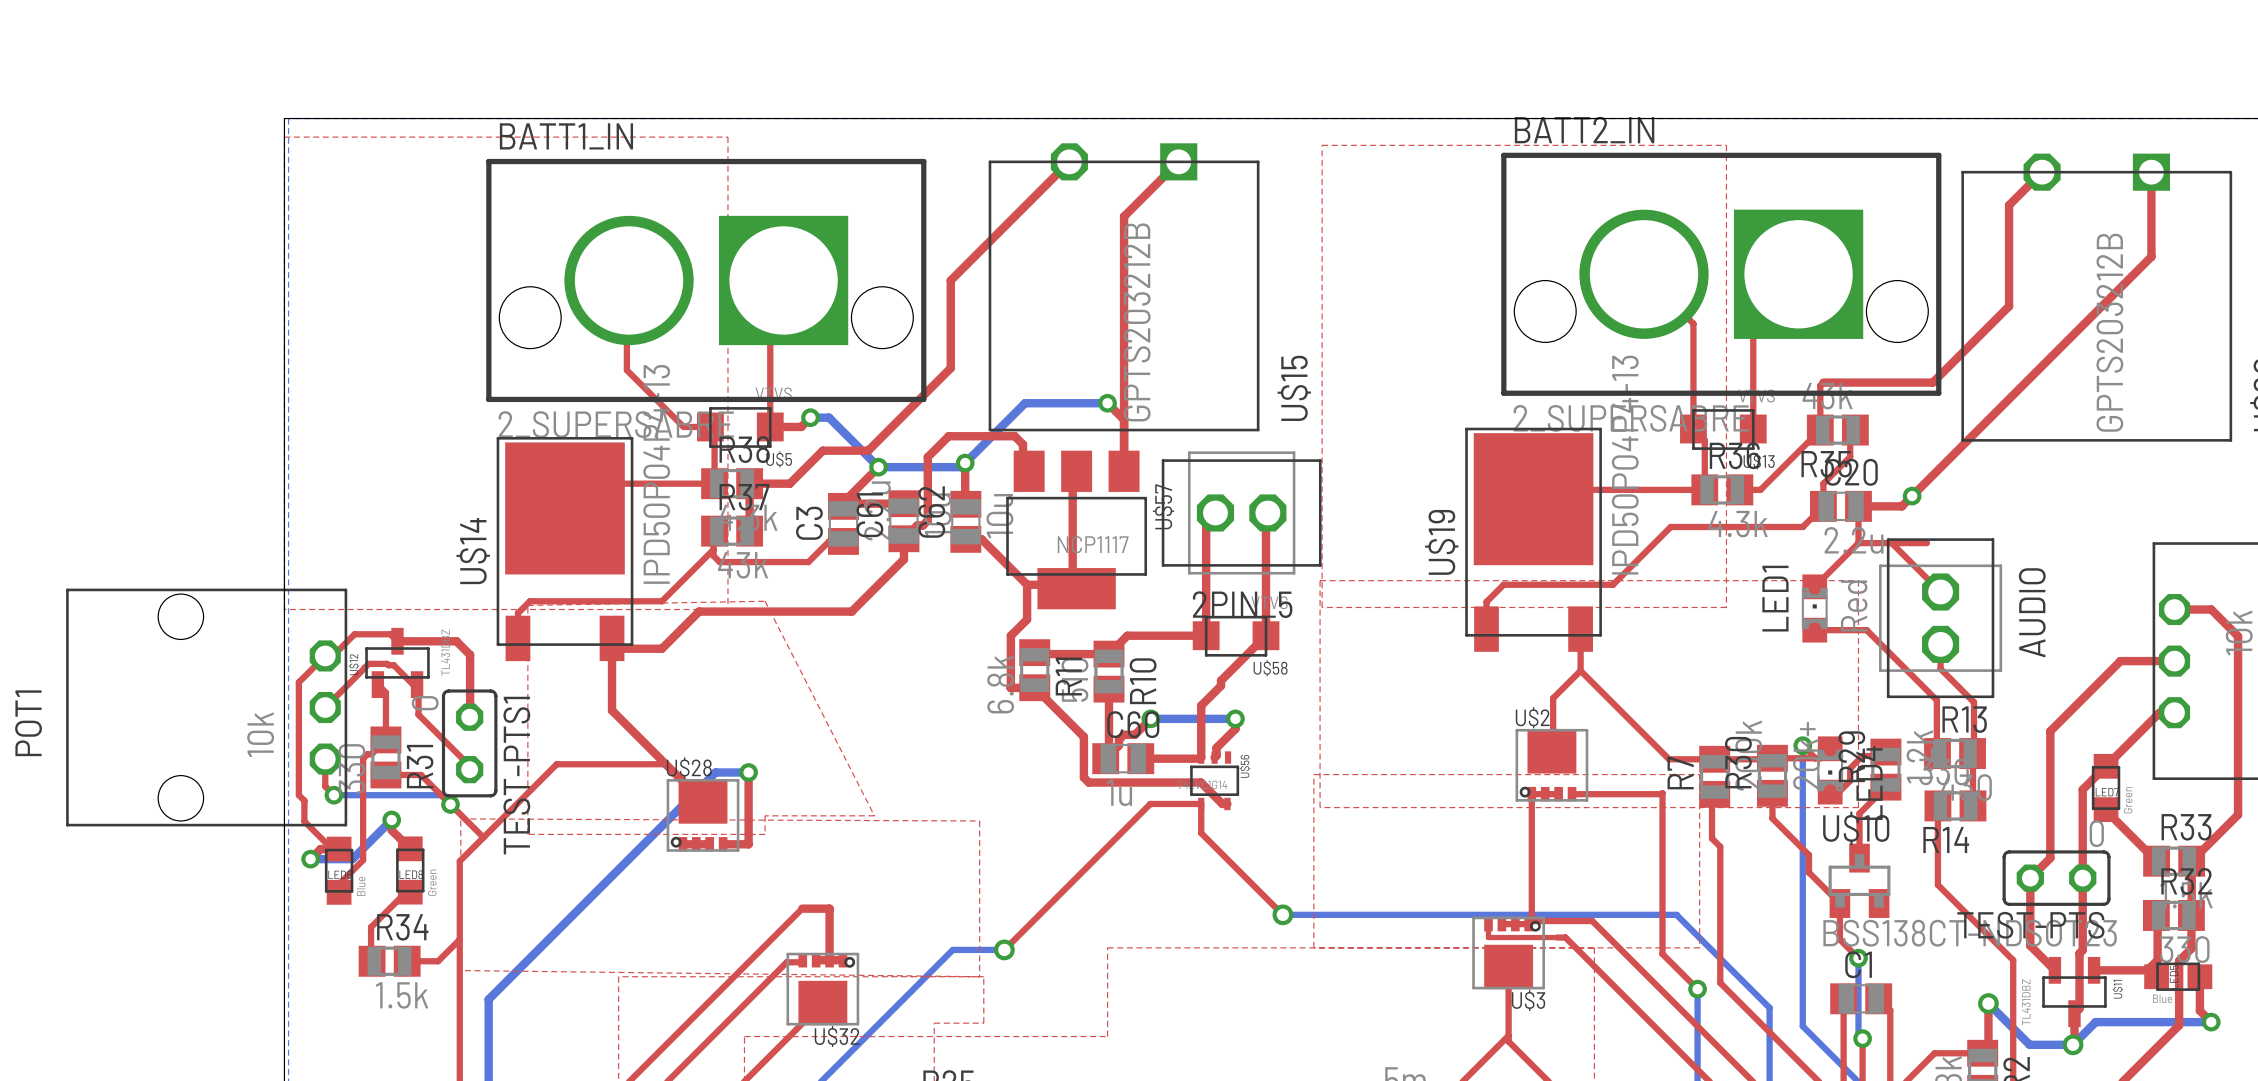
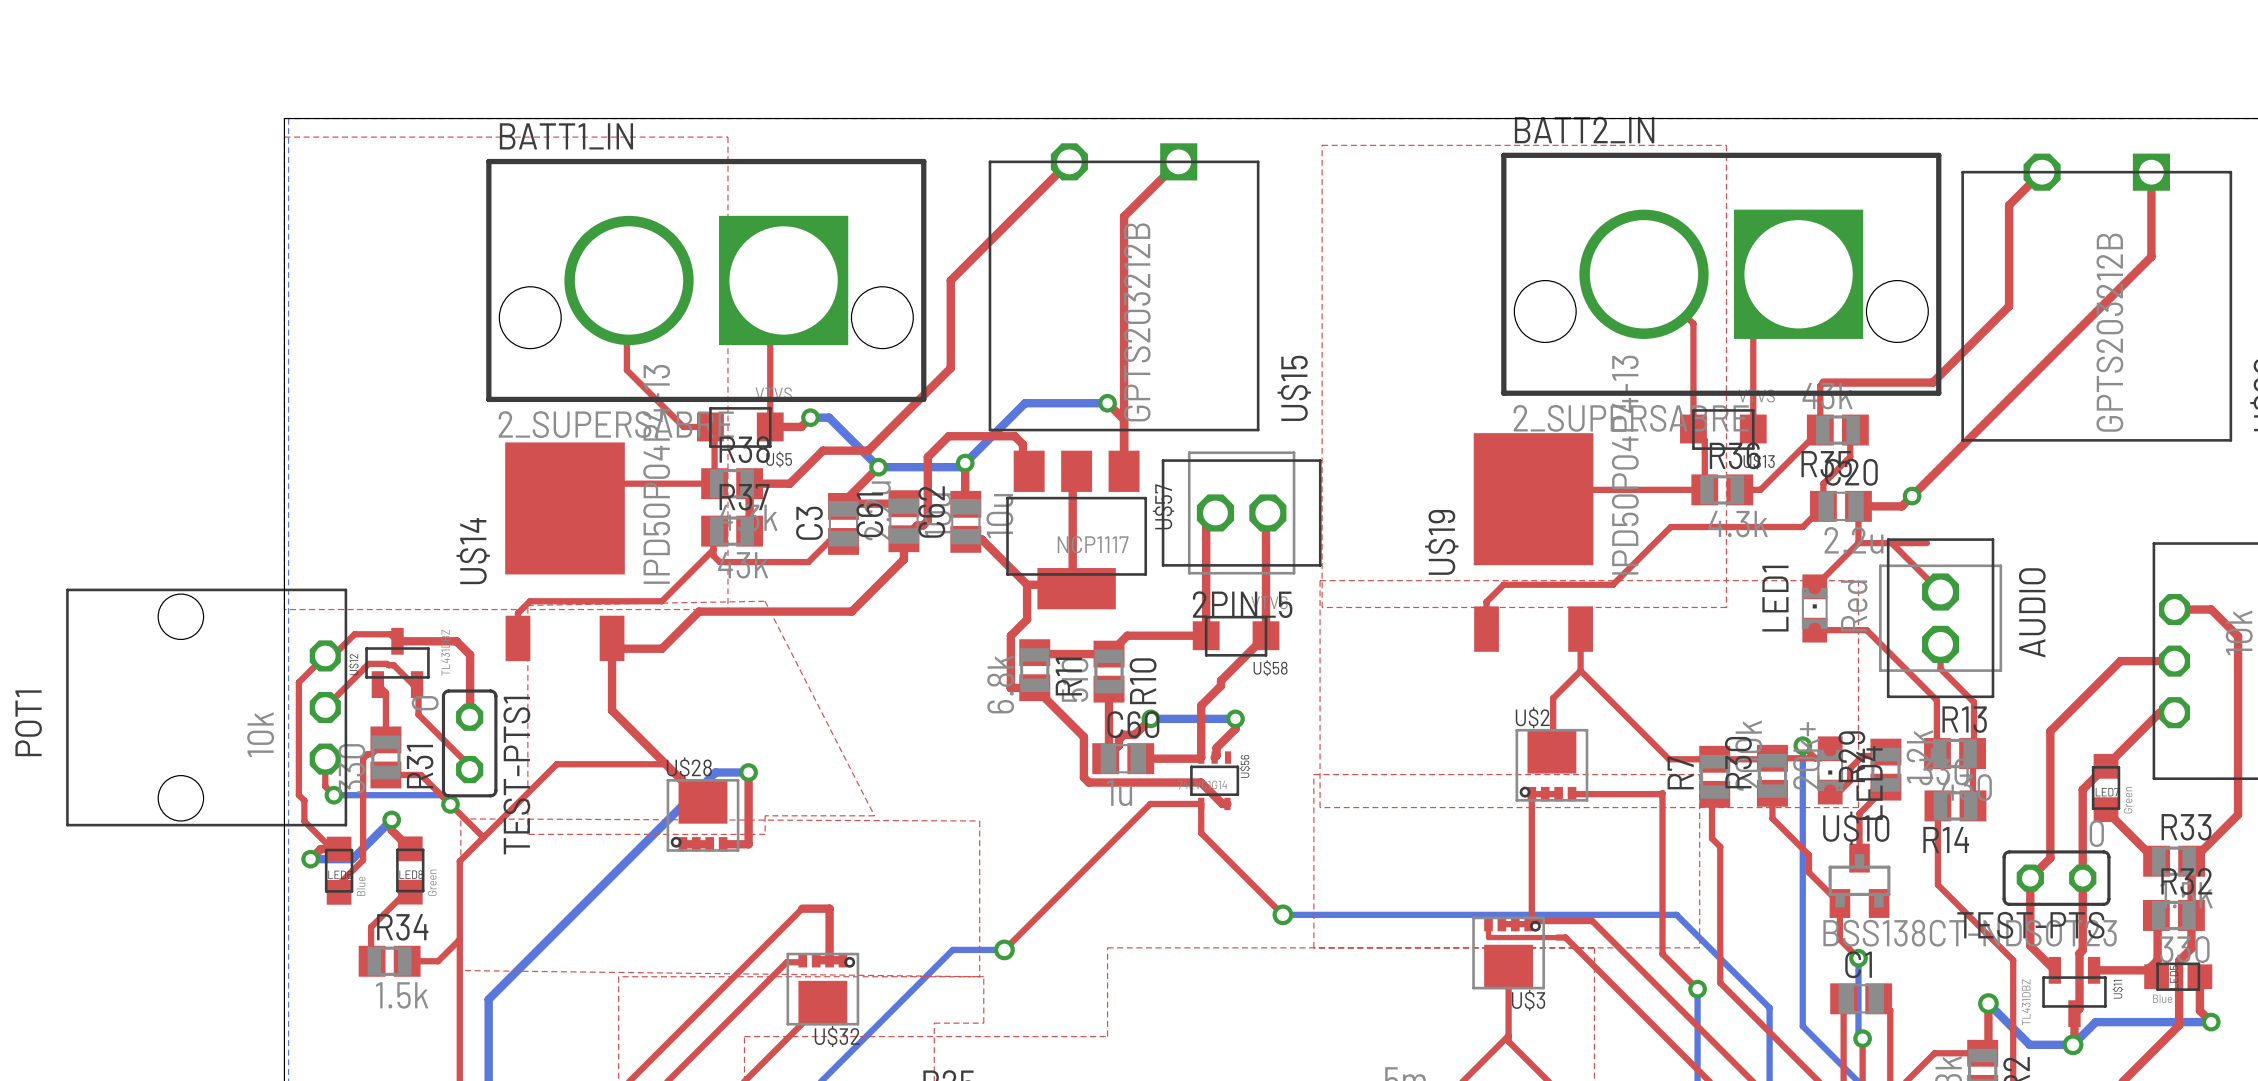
U$19 footprint: [1465, 427, 1602, 652] -> [1473, 433, 1594, 652]
U$14 footprint: [496, 436, 634, 662] -> [505, 442, 625, 662]

